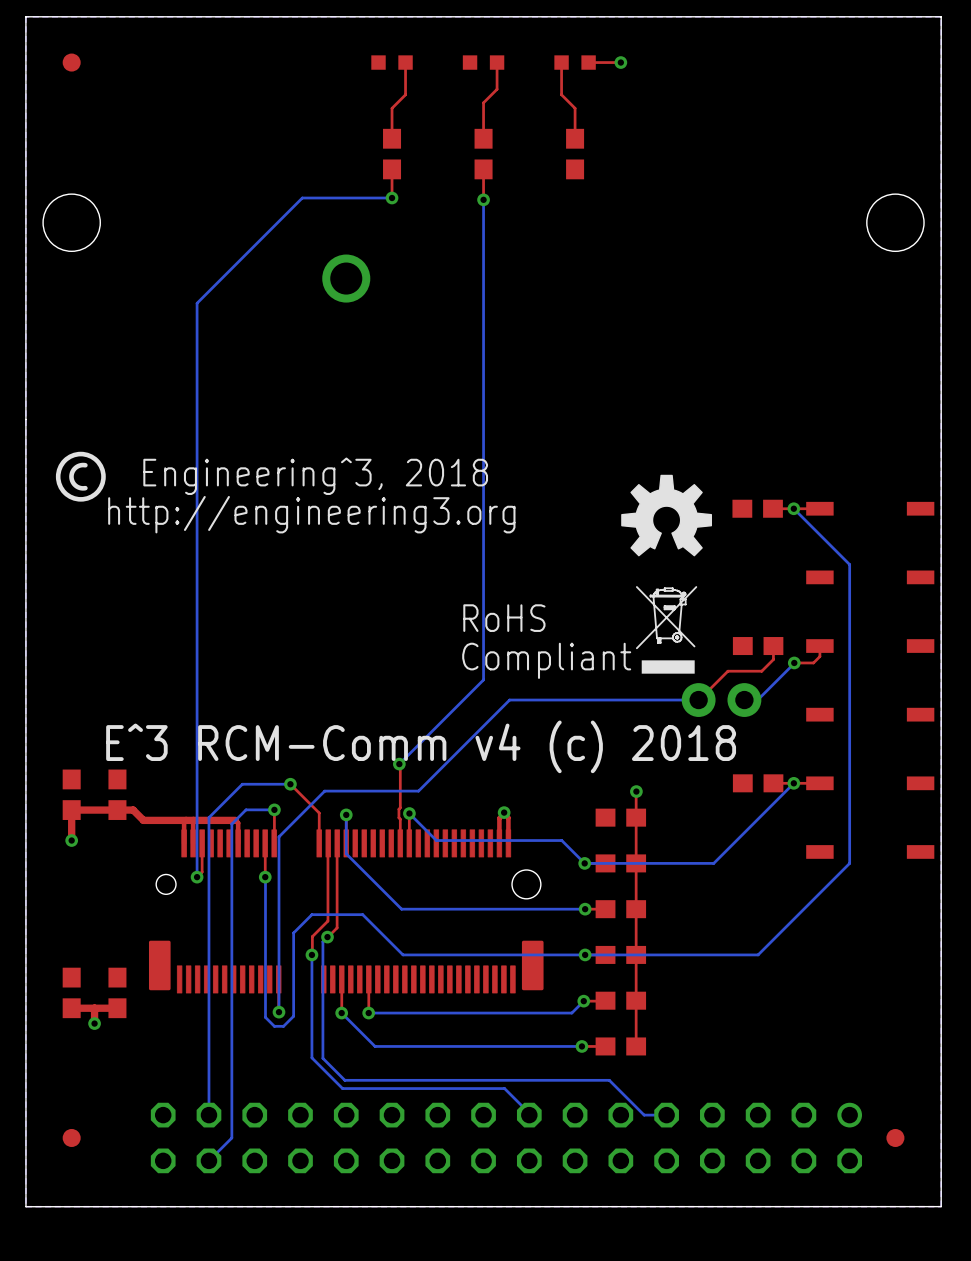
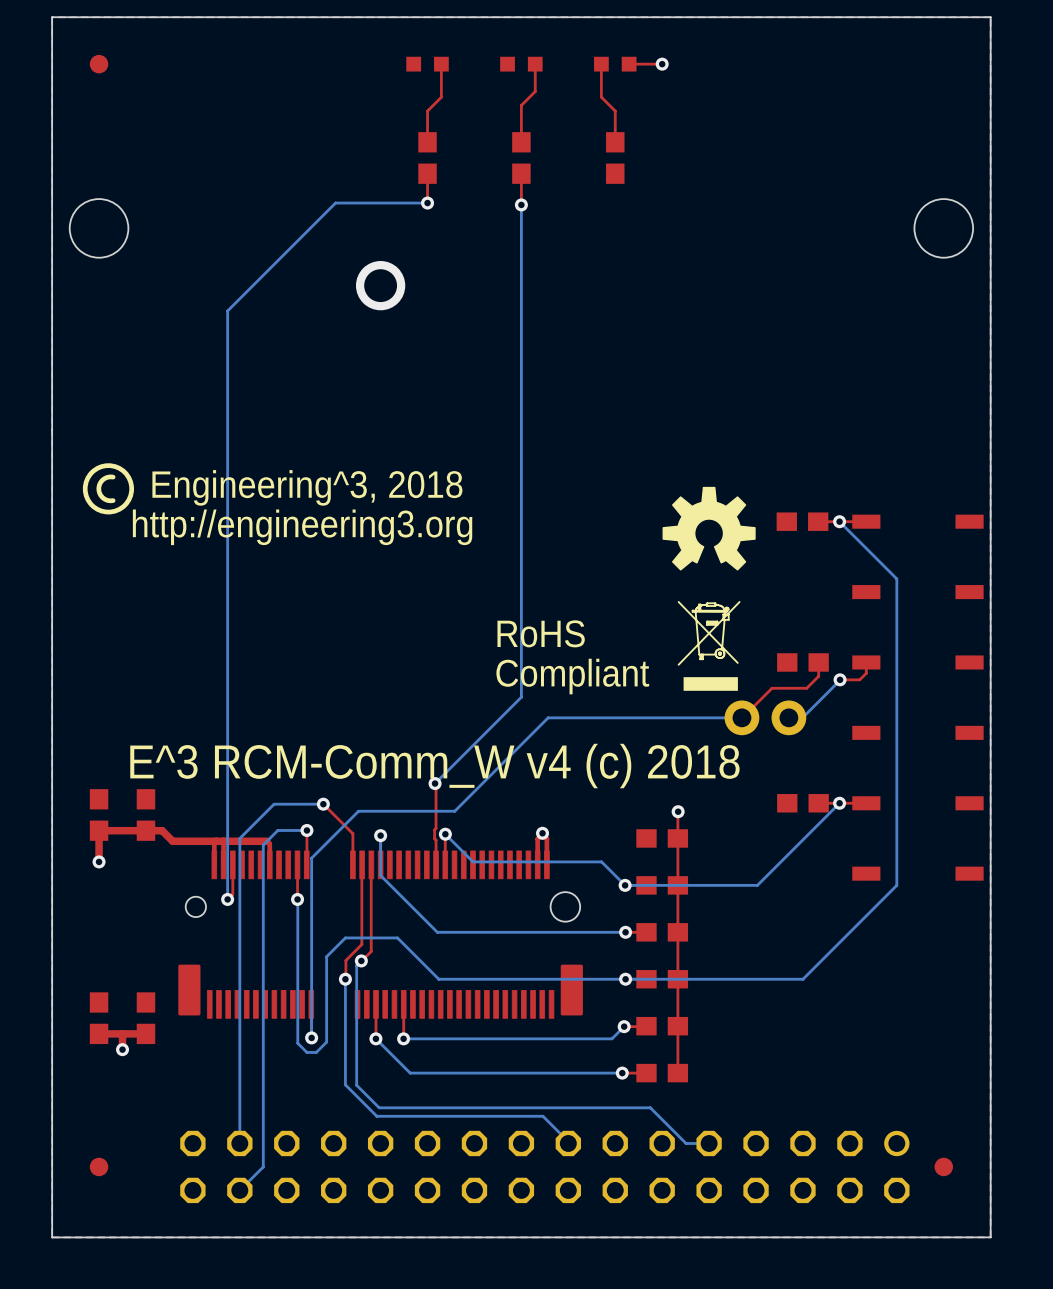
text: E^3 RCM-Comm v4 (c) 2018 (421, 746) -> E^3 RCM-Comm_W v4 (c) 2018 (434, 766)

